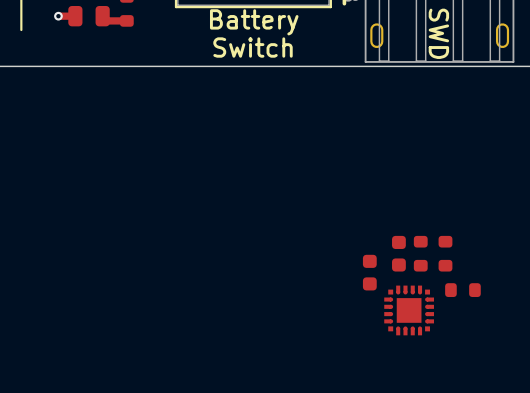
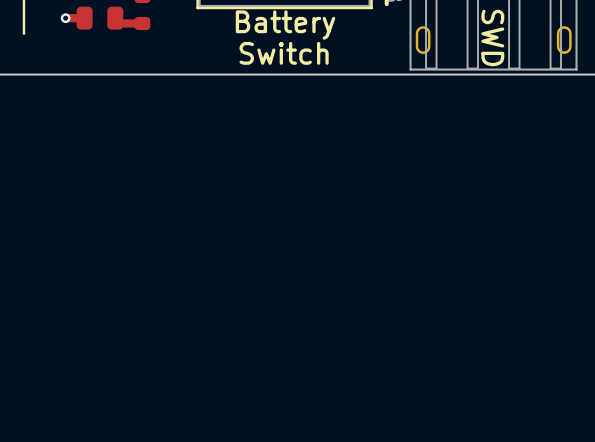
part: (398, 253) -> none
part: (420, 253) -> none
part: (445, 253) -> none
part: (369, 272) -> none
part: (462, 290) -> none
part: (409, 310) -> none

